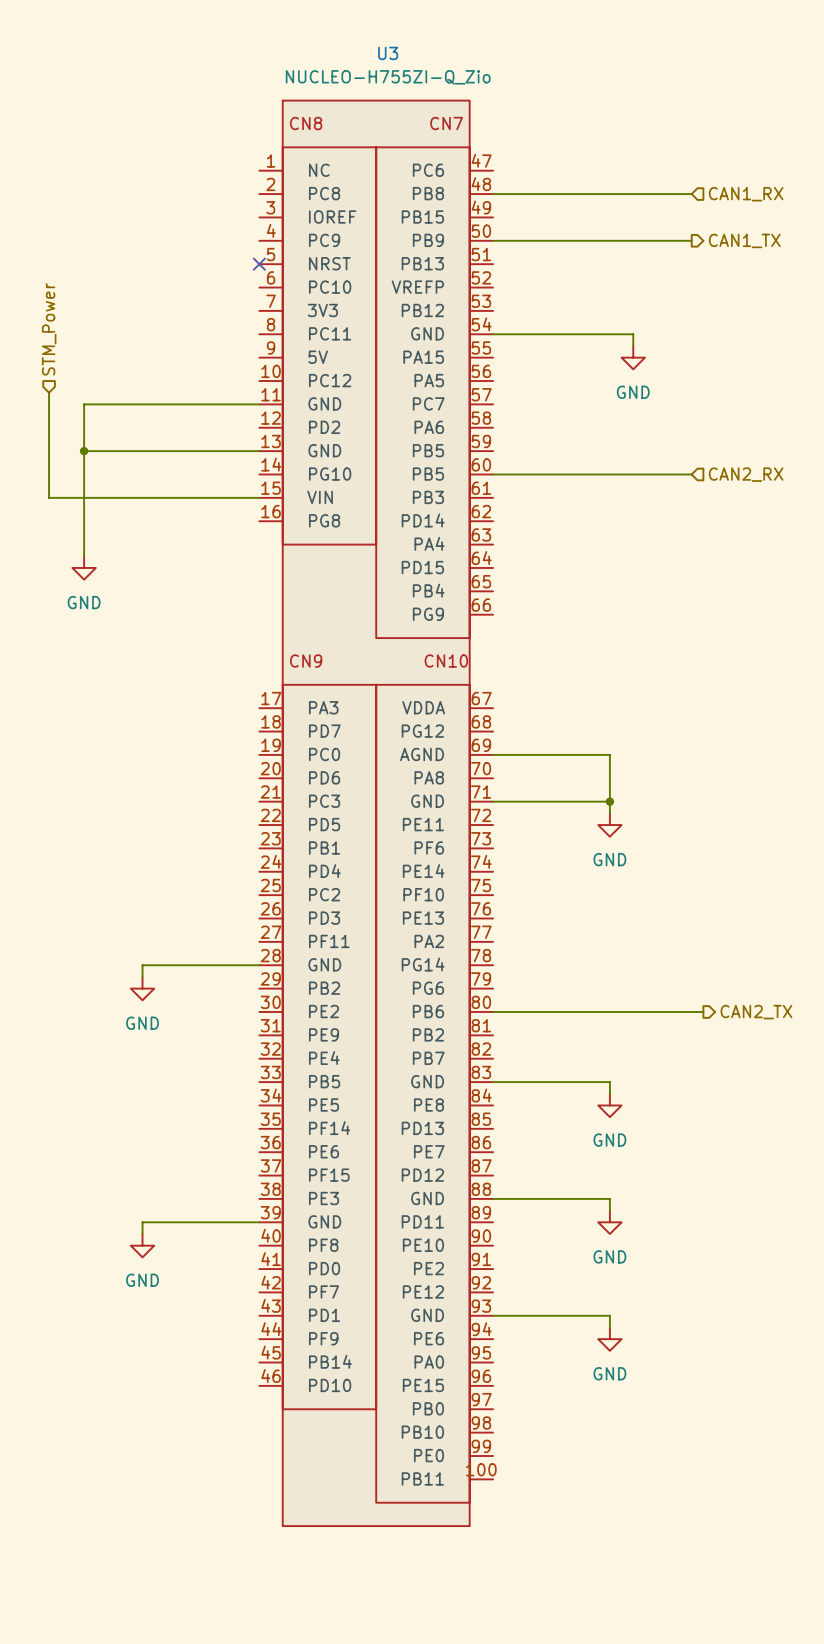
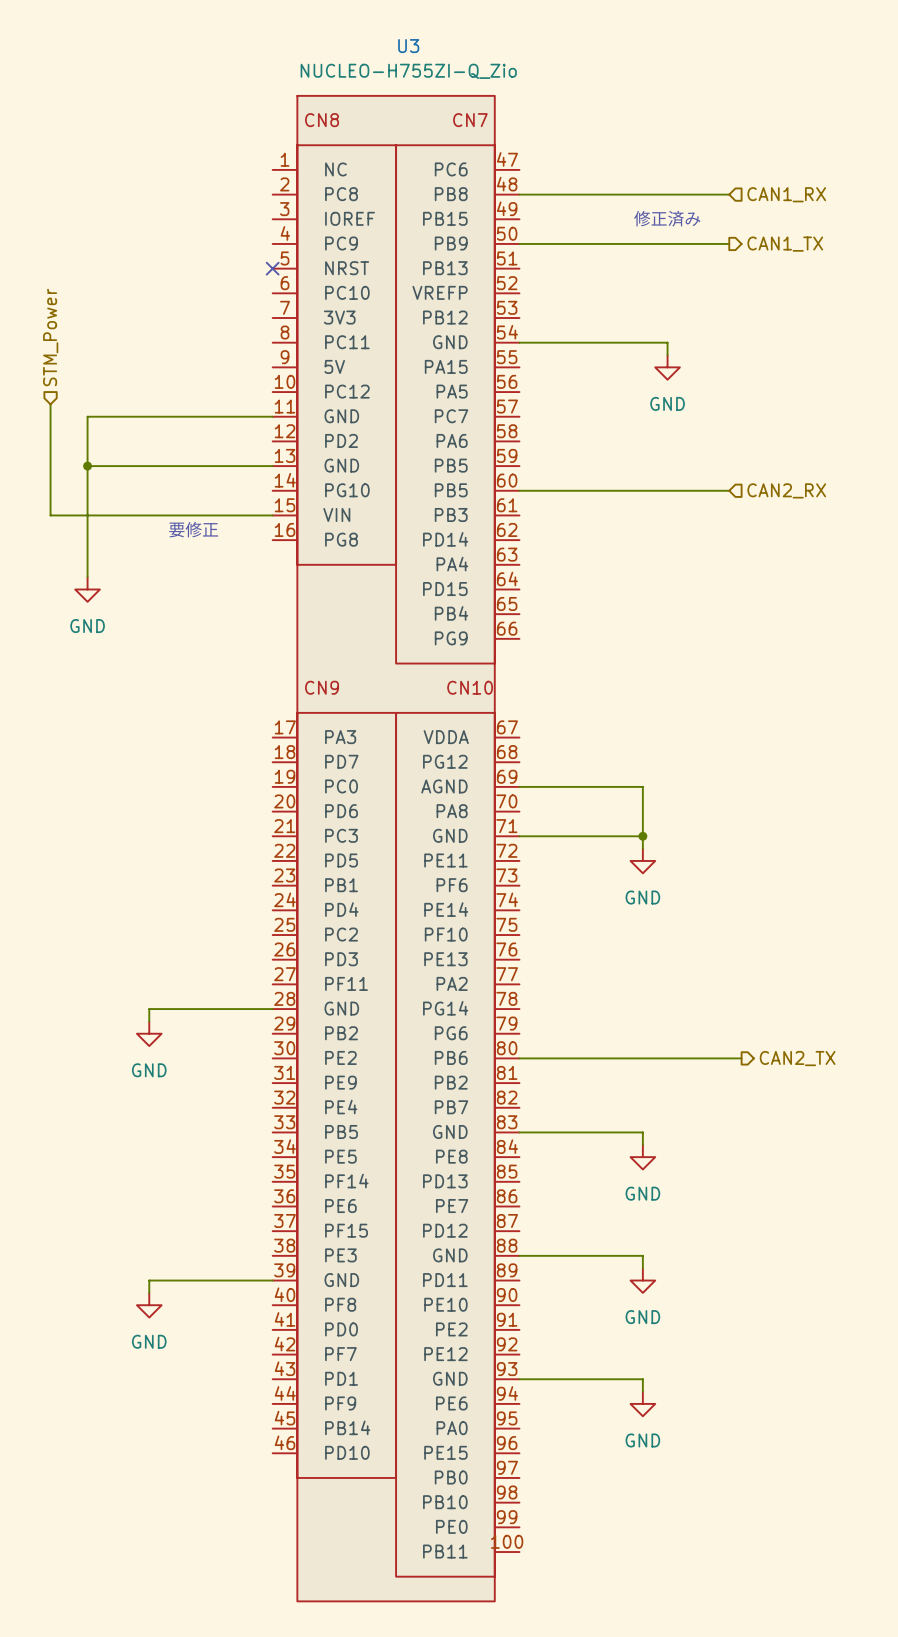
text: none -> 修正済み (667, 218)
text: none -> 要修正 (193, 529)

